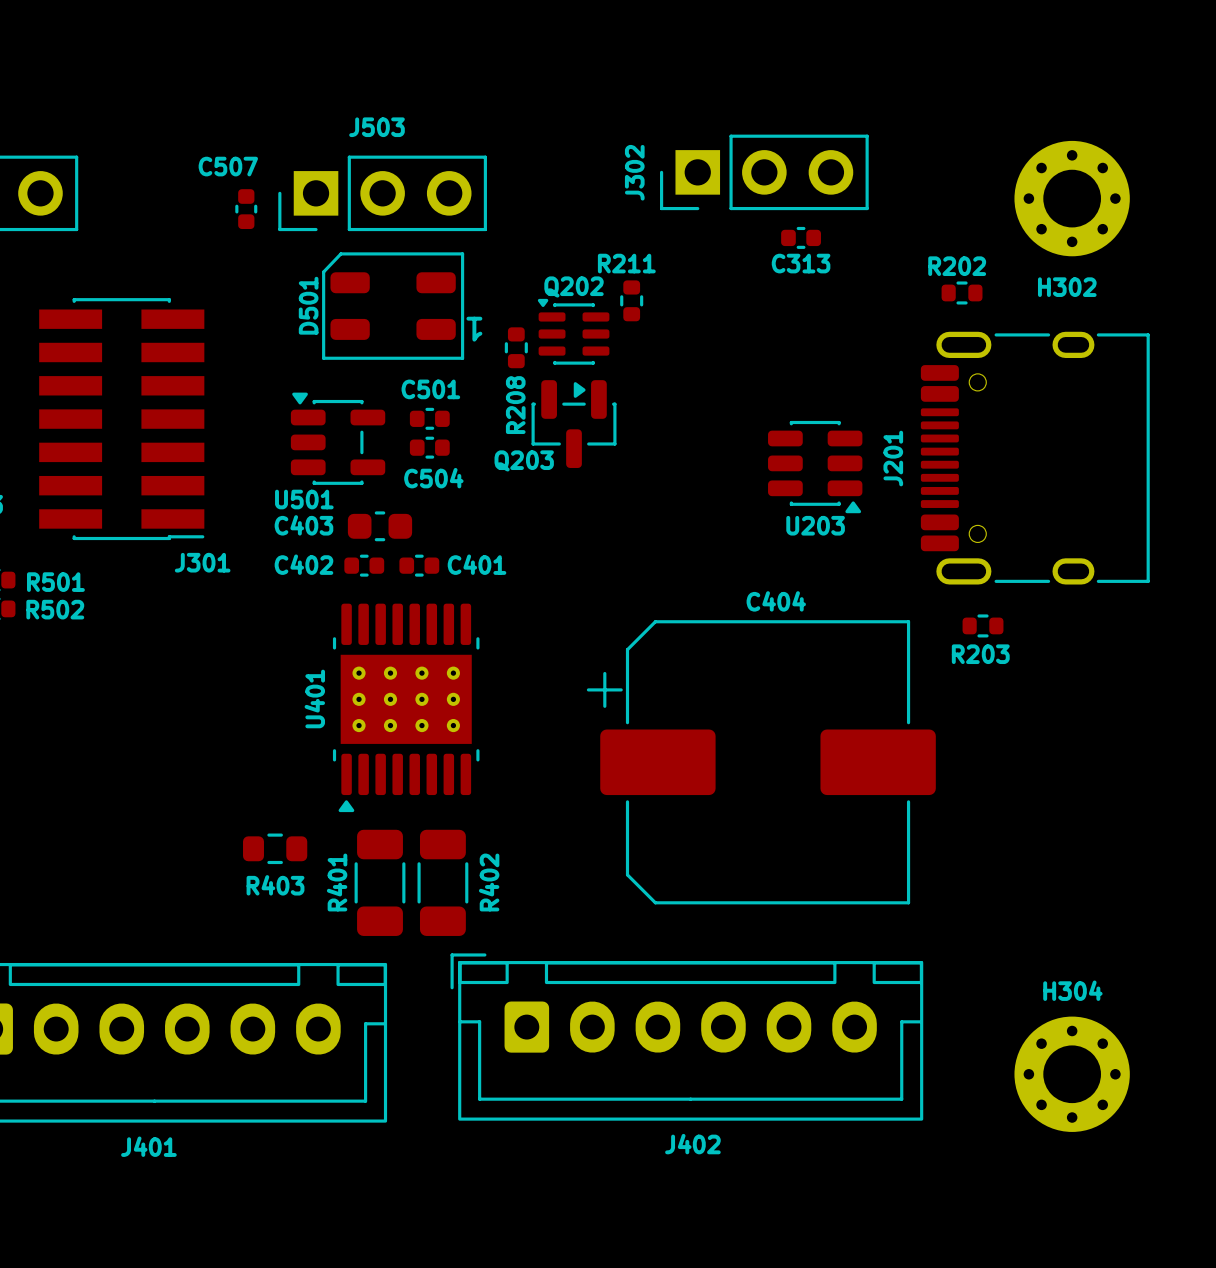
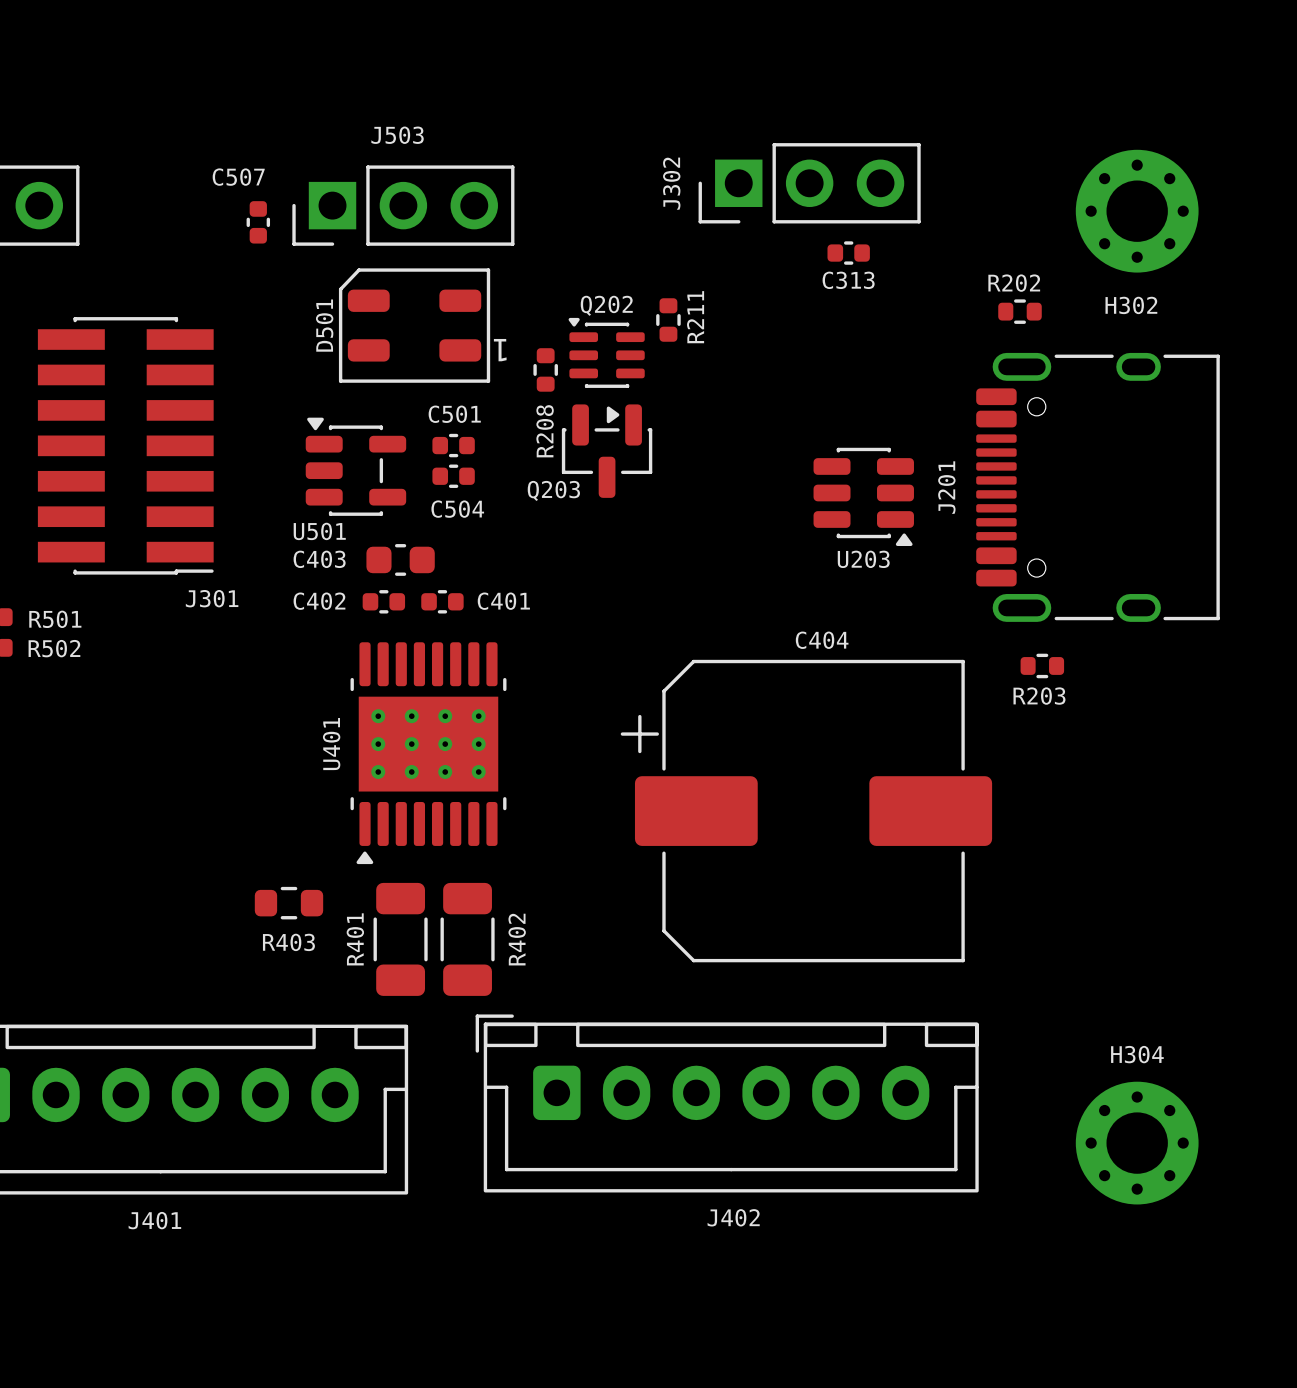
R211 name rotation: 0° (626, 263) -> 90° counterclockwise (695, 317)

